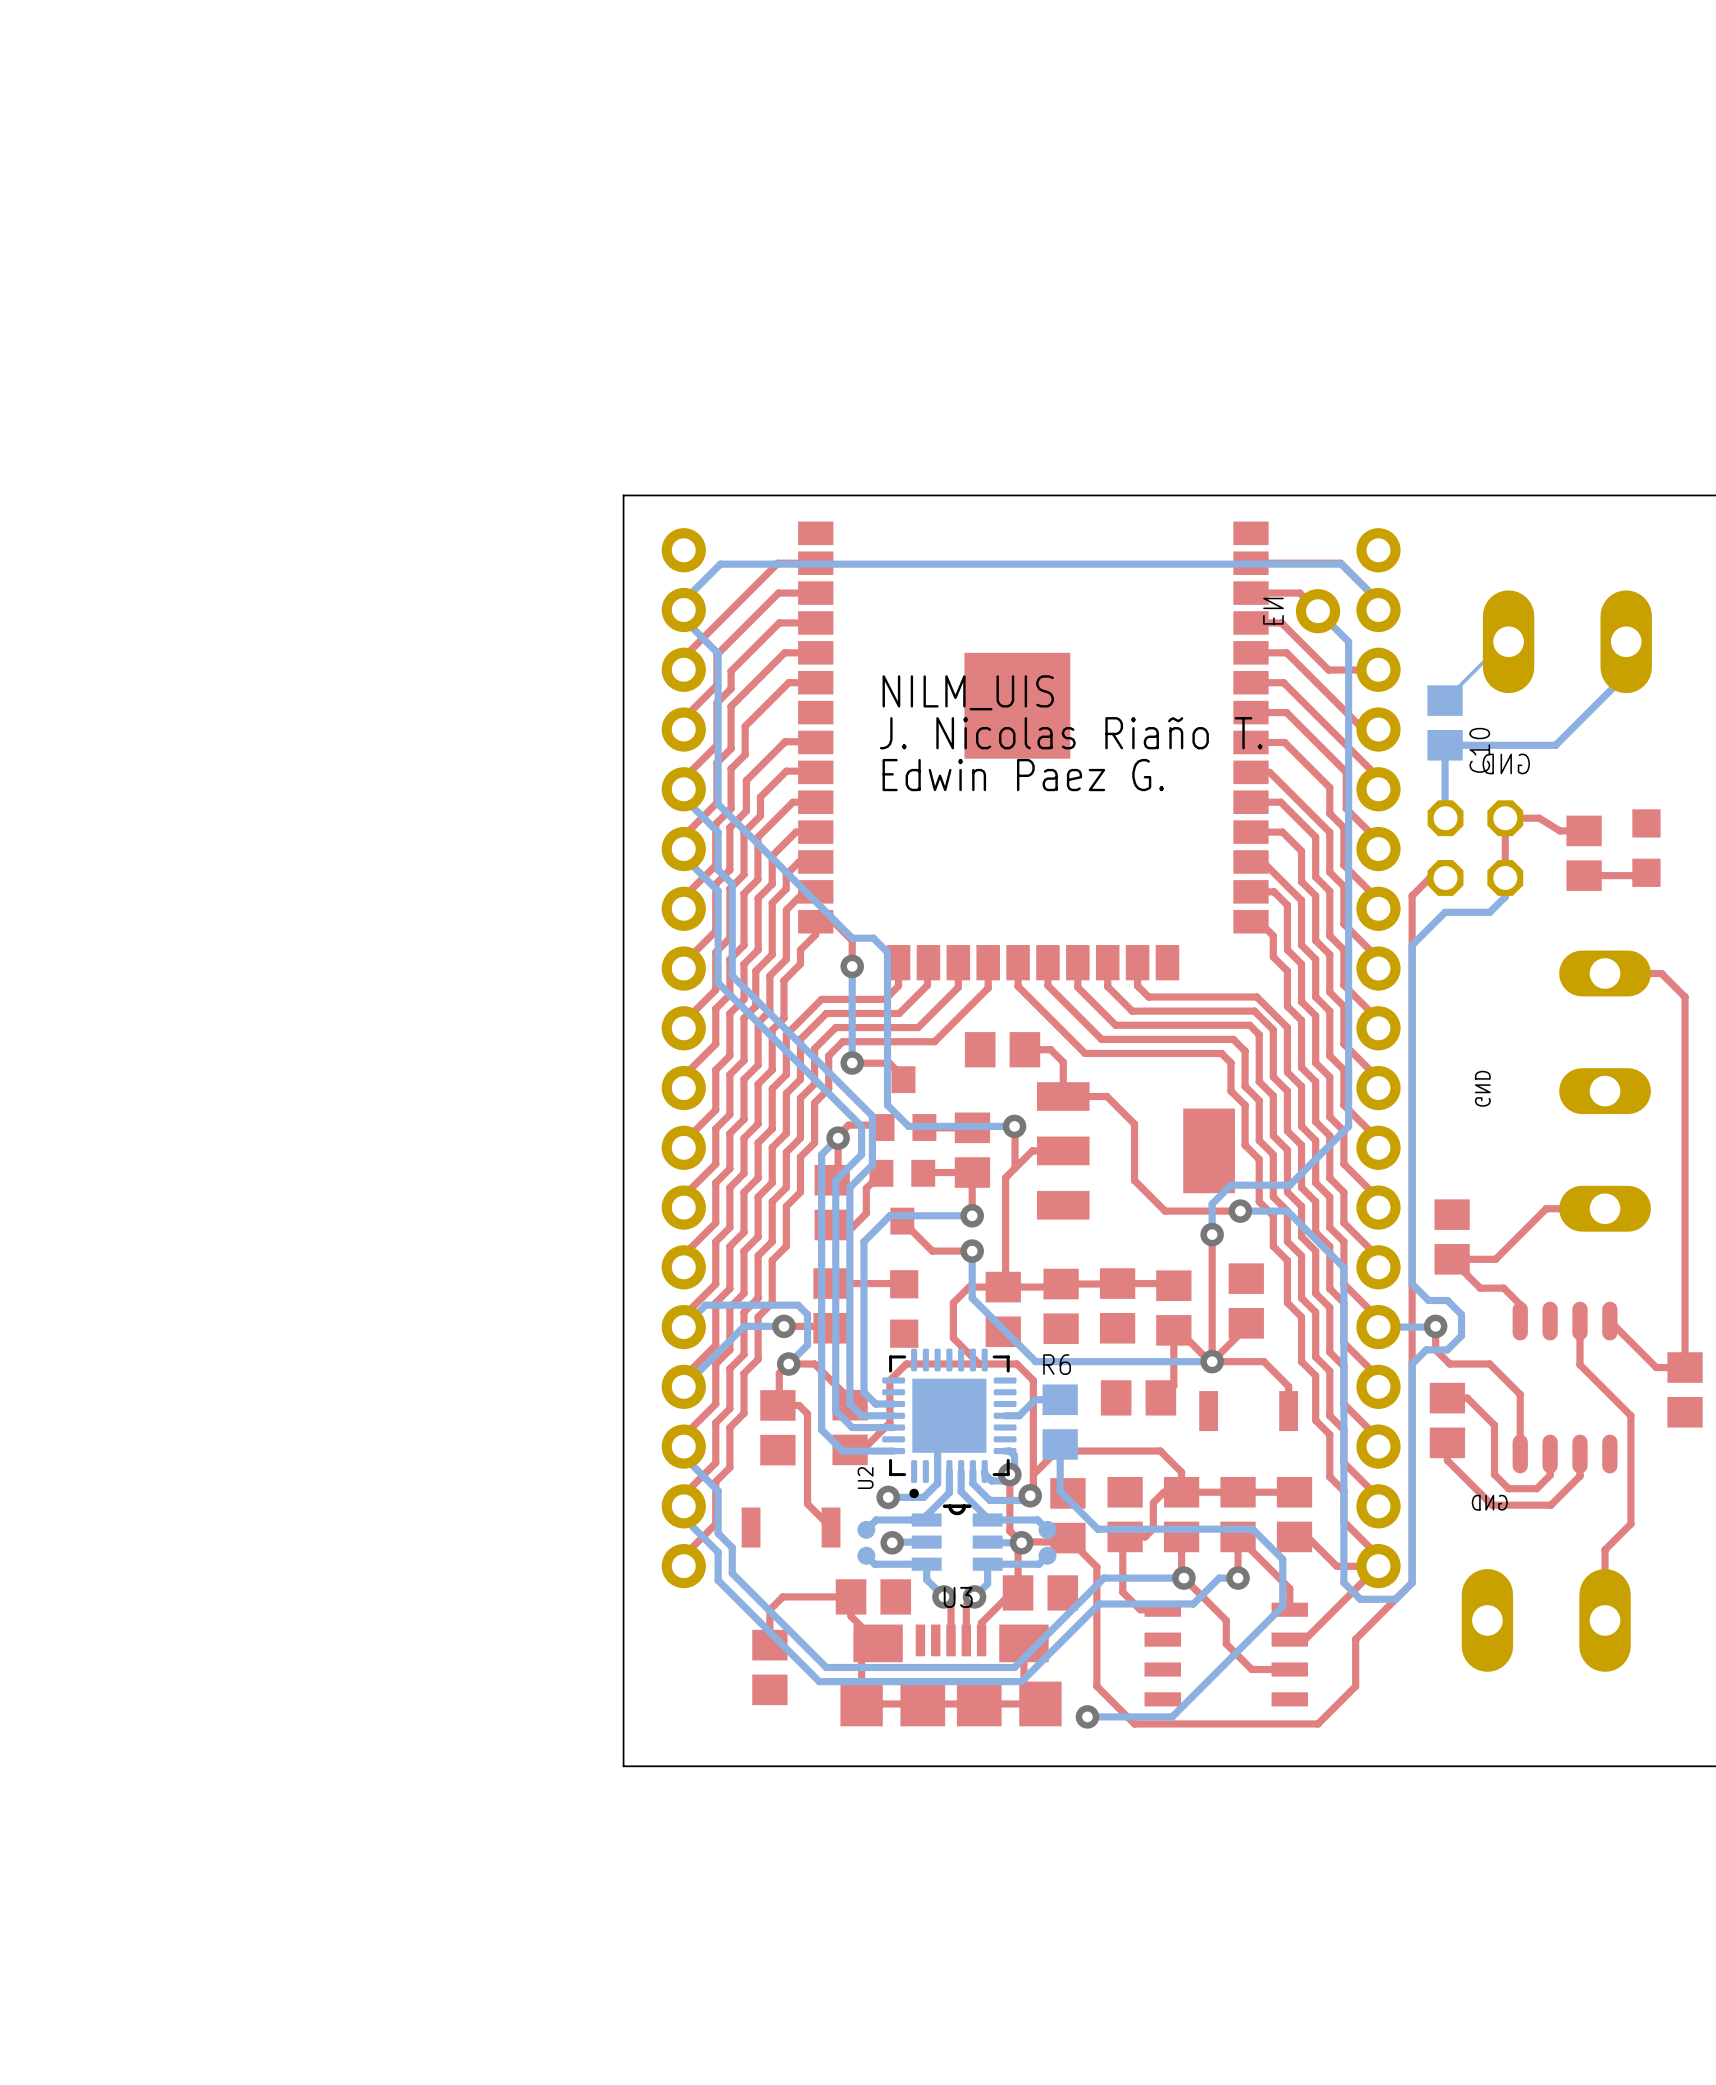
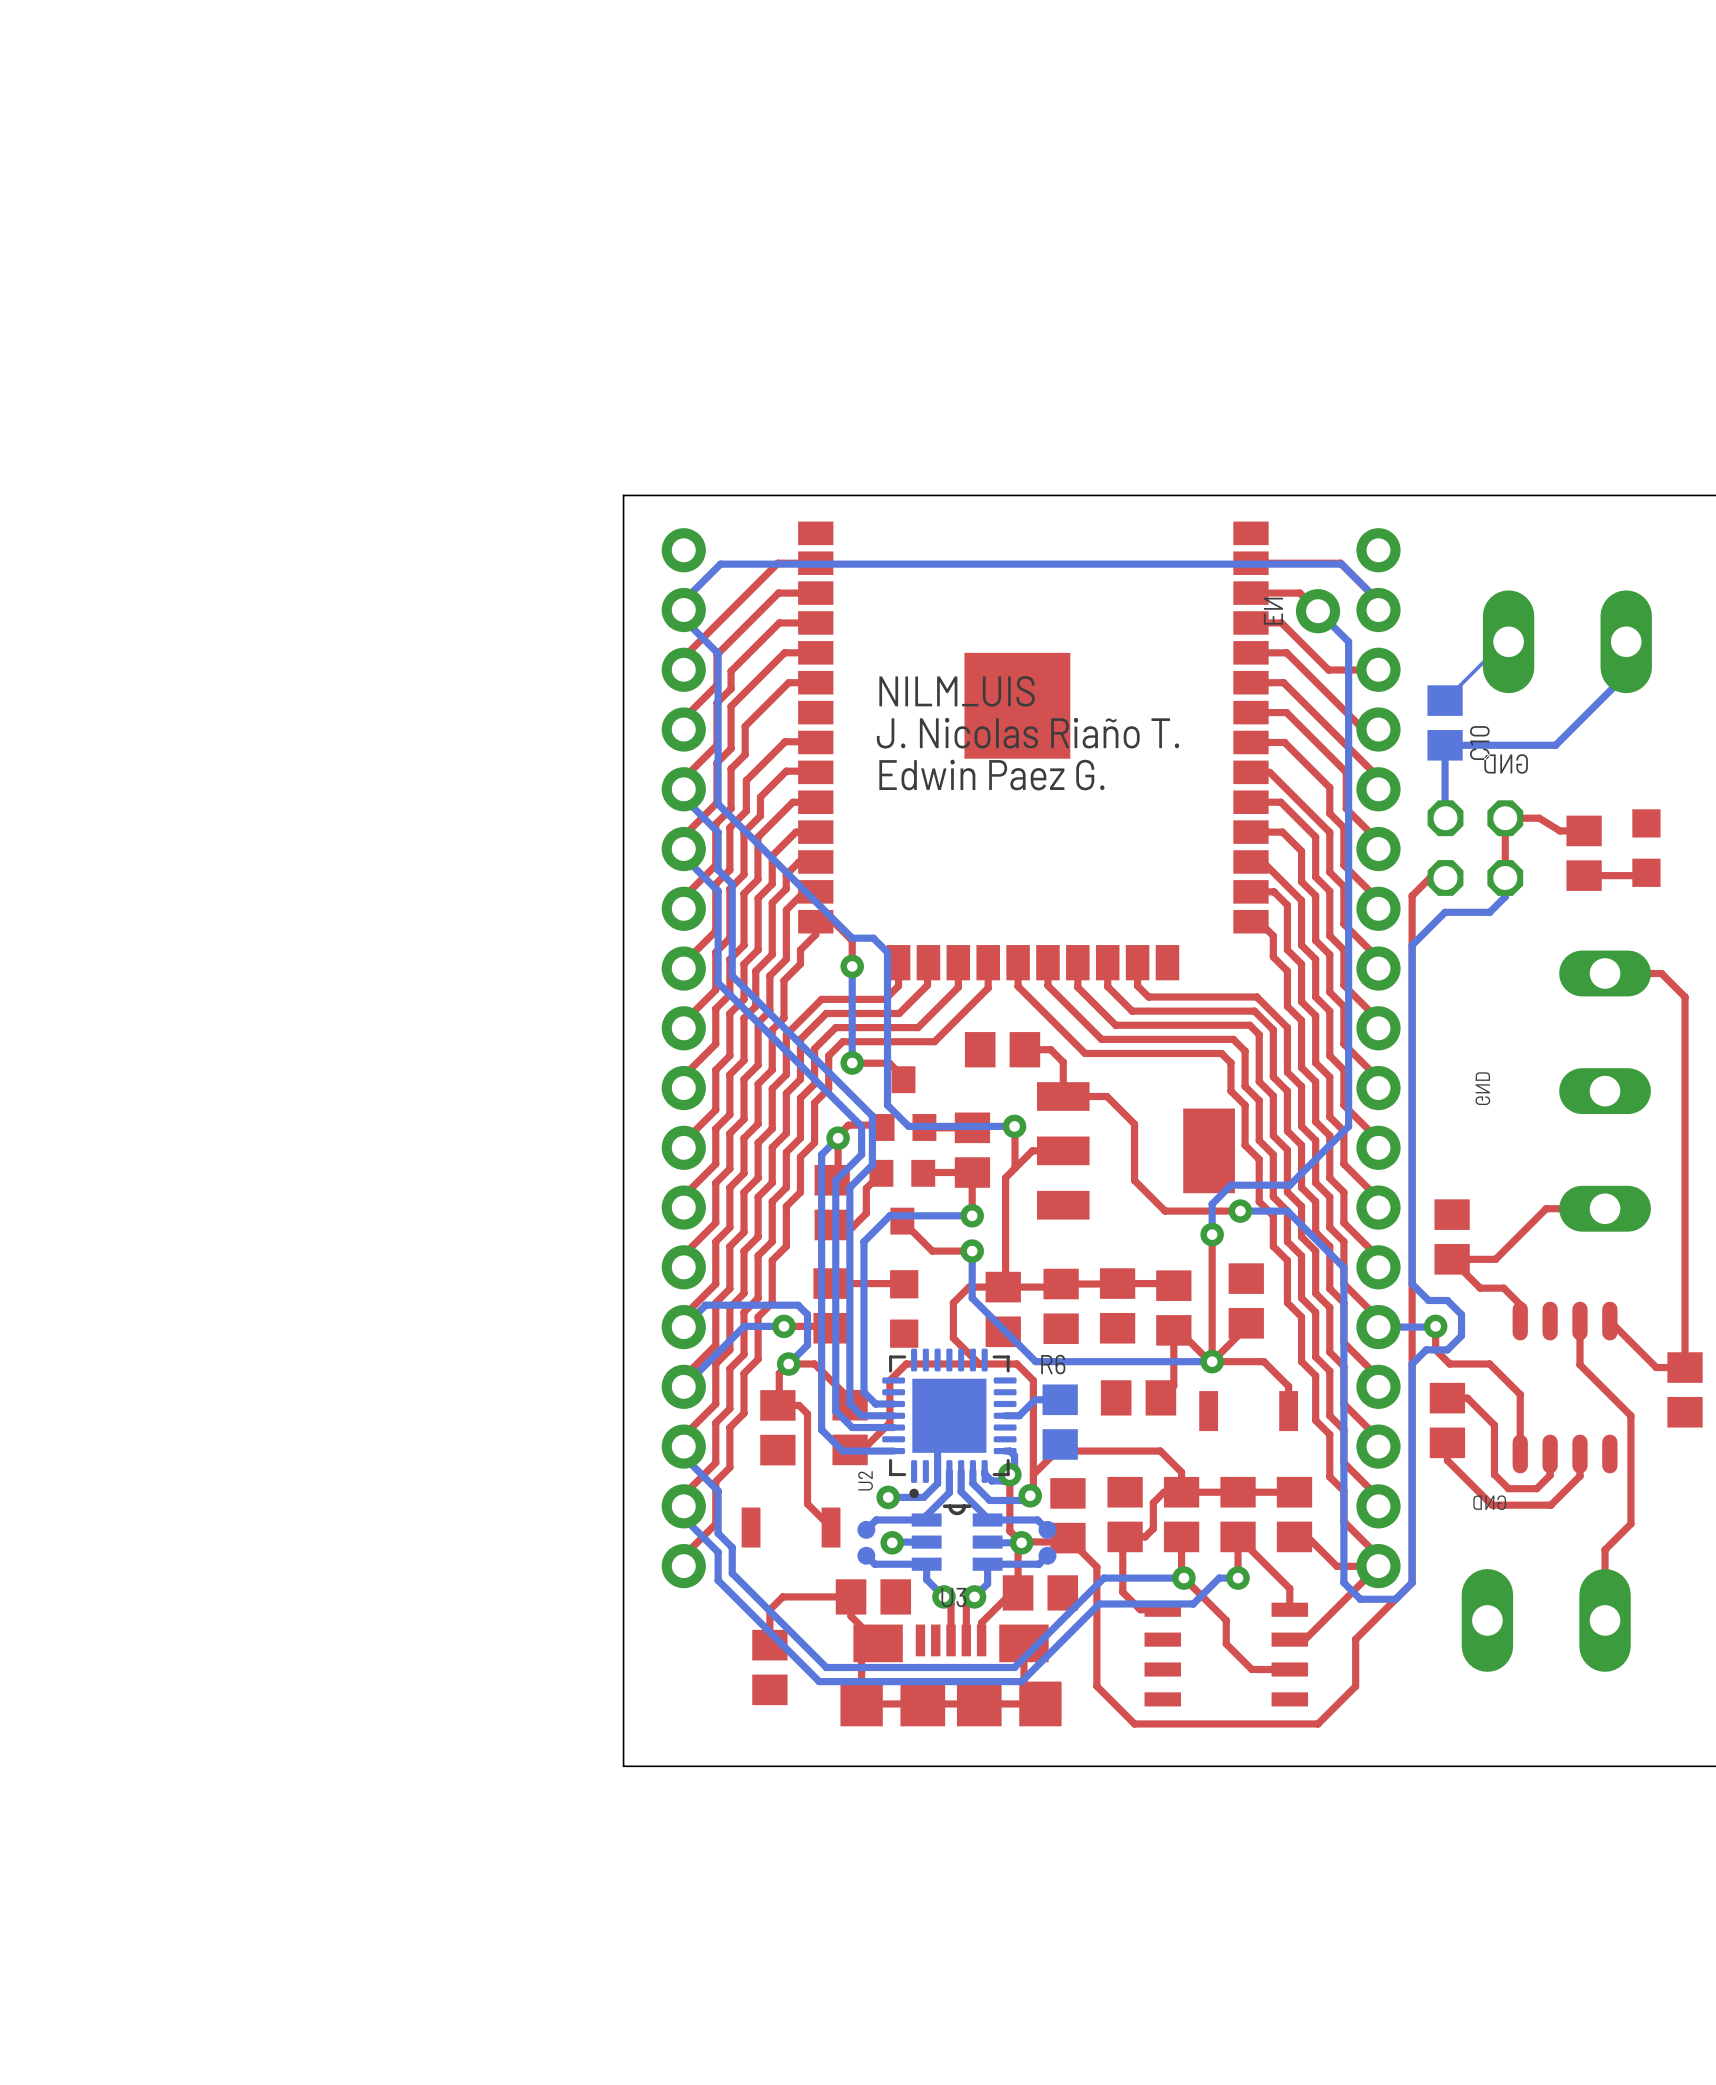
bottom track: (1060, 1444) (1060, 1491) (1097, 1529) (1252, 1529) (1282, 1559) (1282, 1606) (1172, 1716) (1087, 1716) -> none
via: (1087, 1716) -> none

